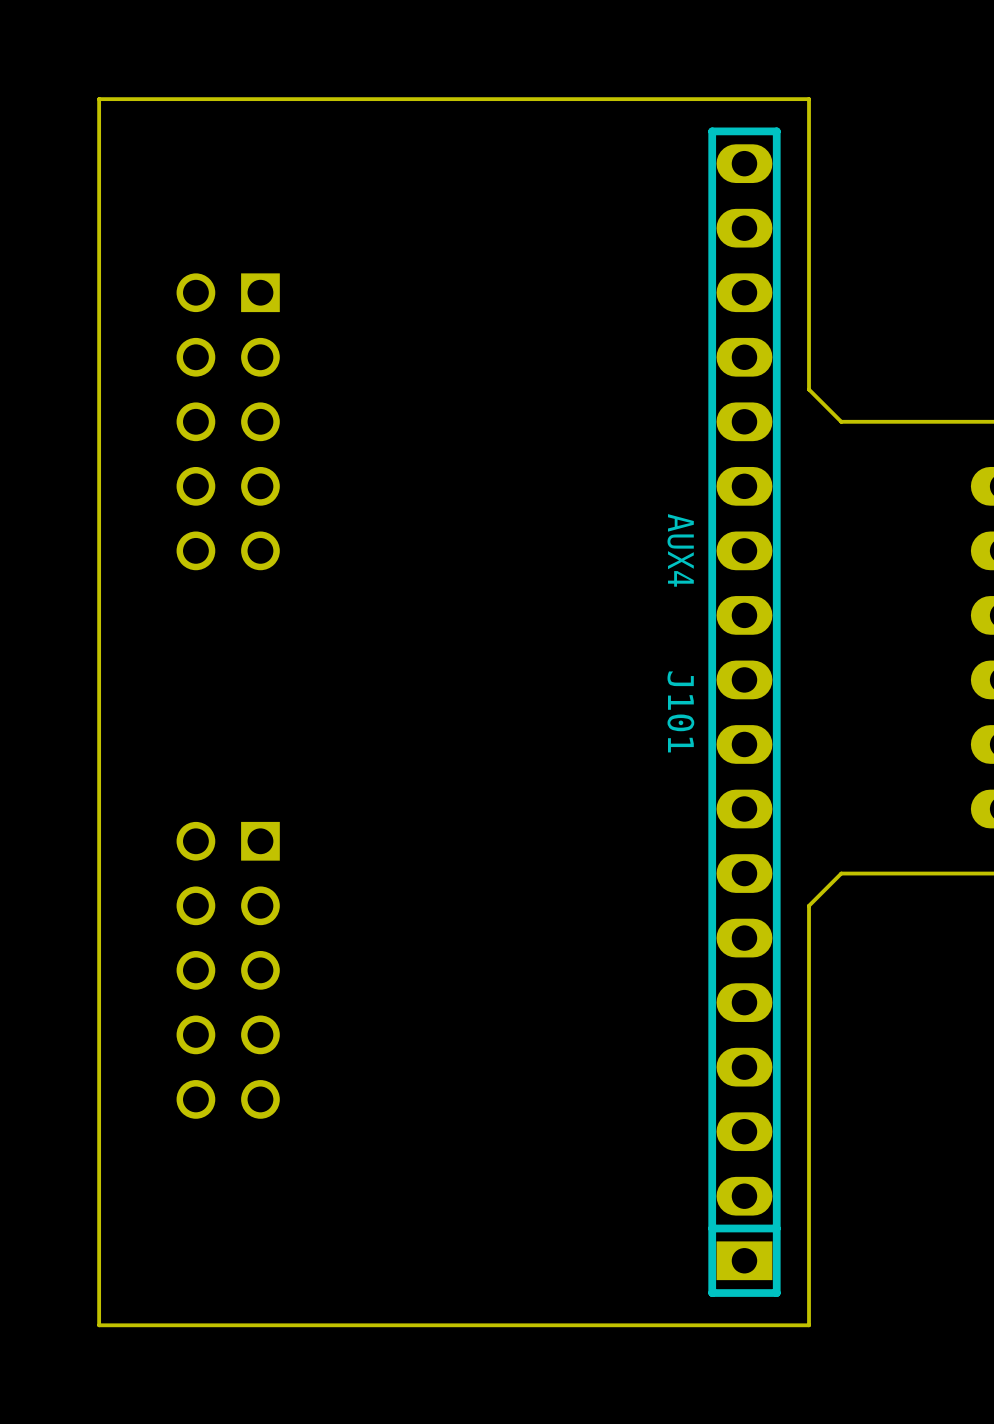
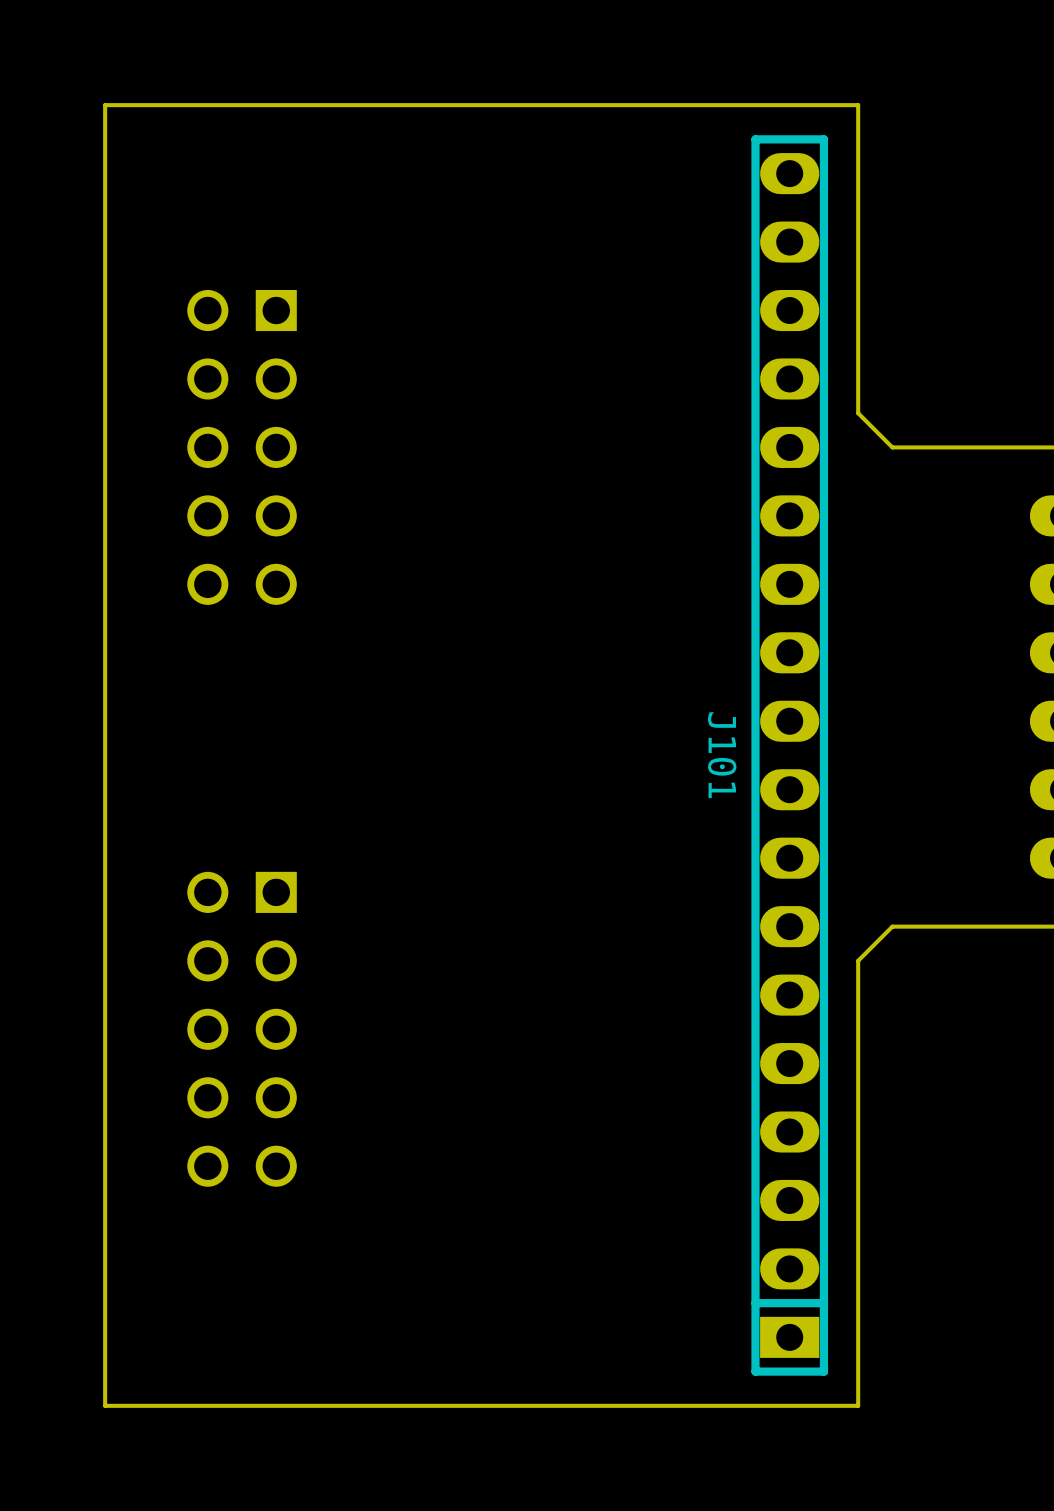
J101 value: AUX4 (680, 550) -> none

